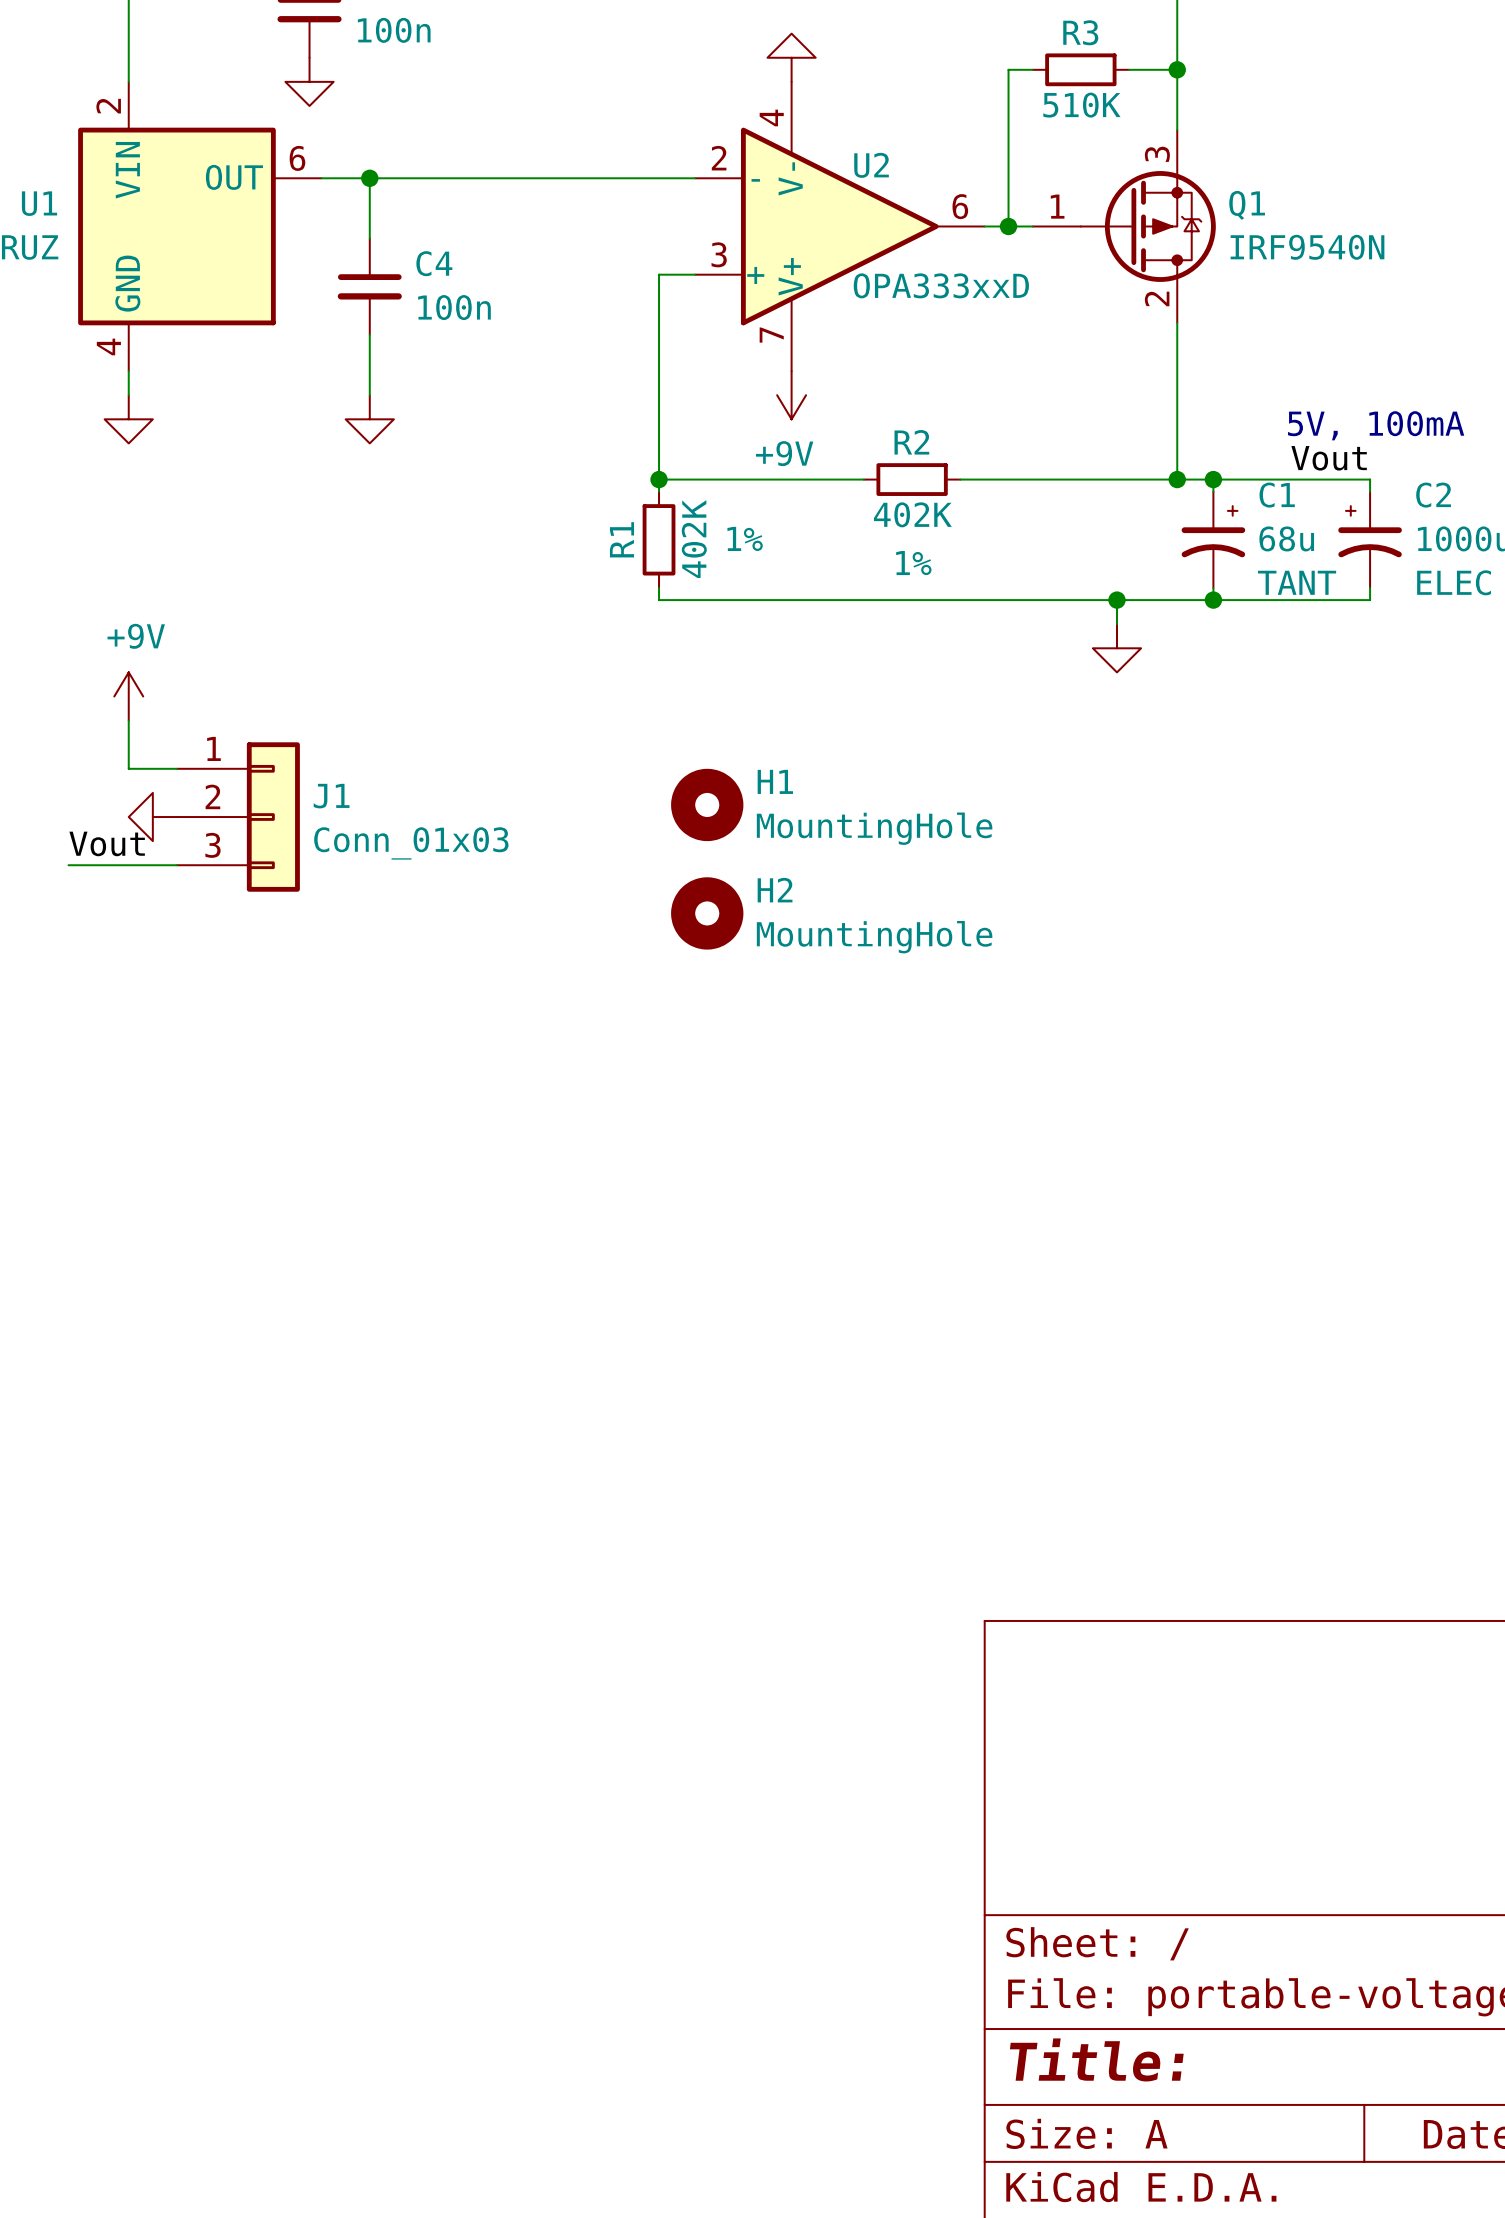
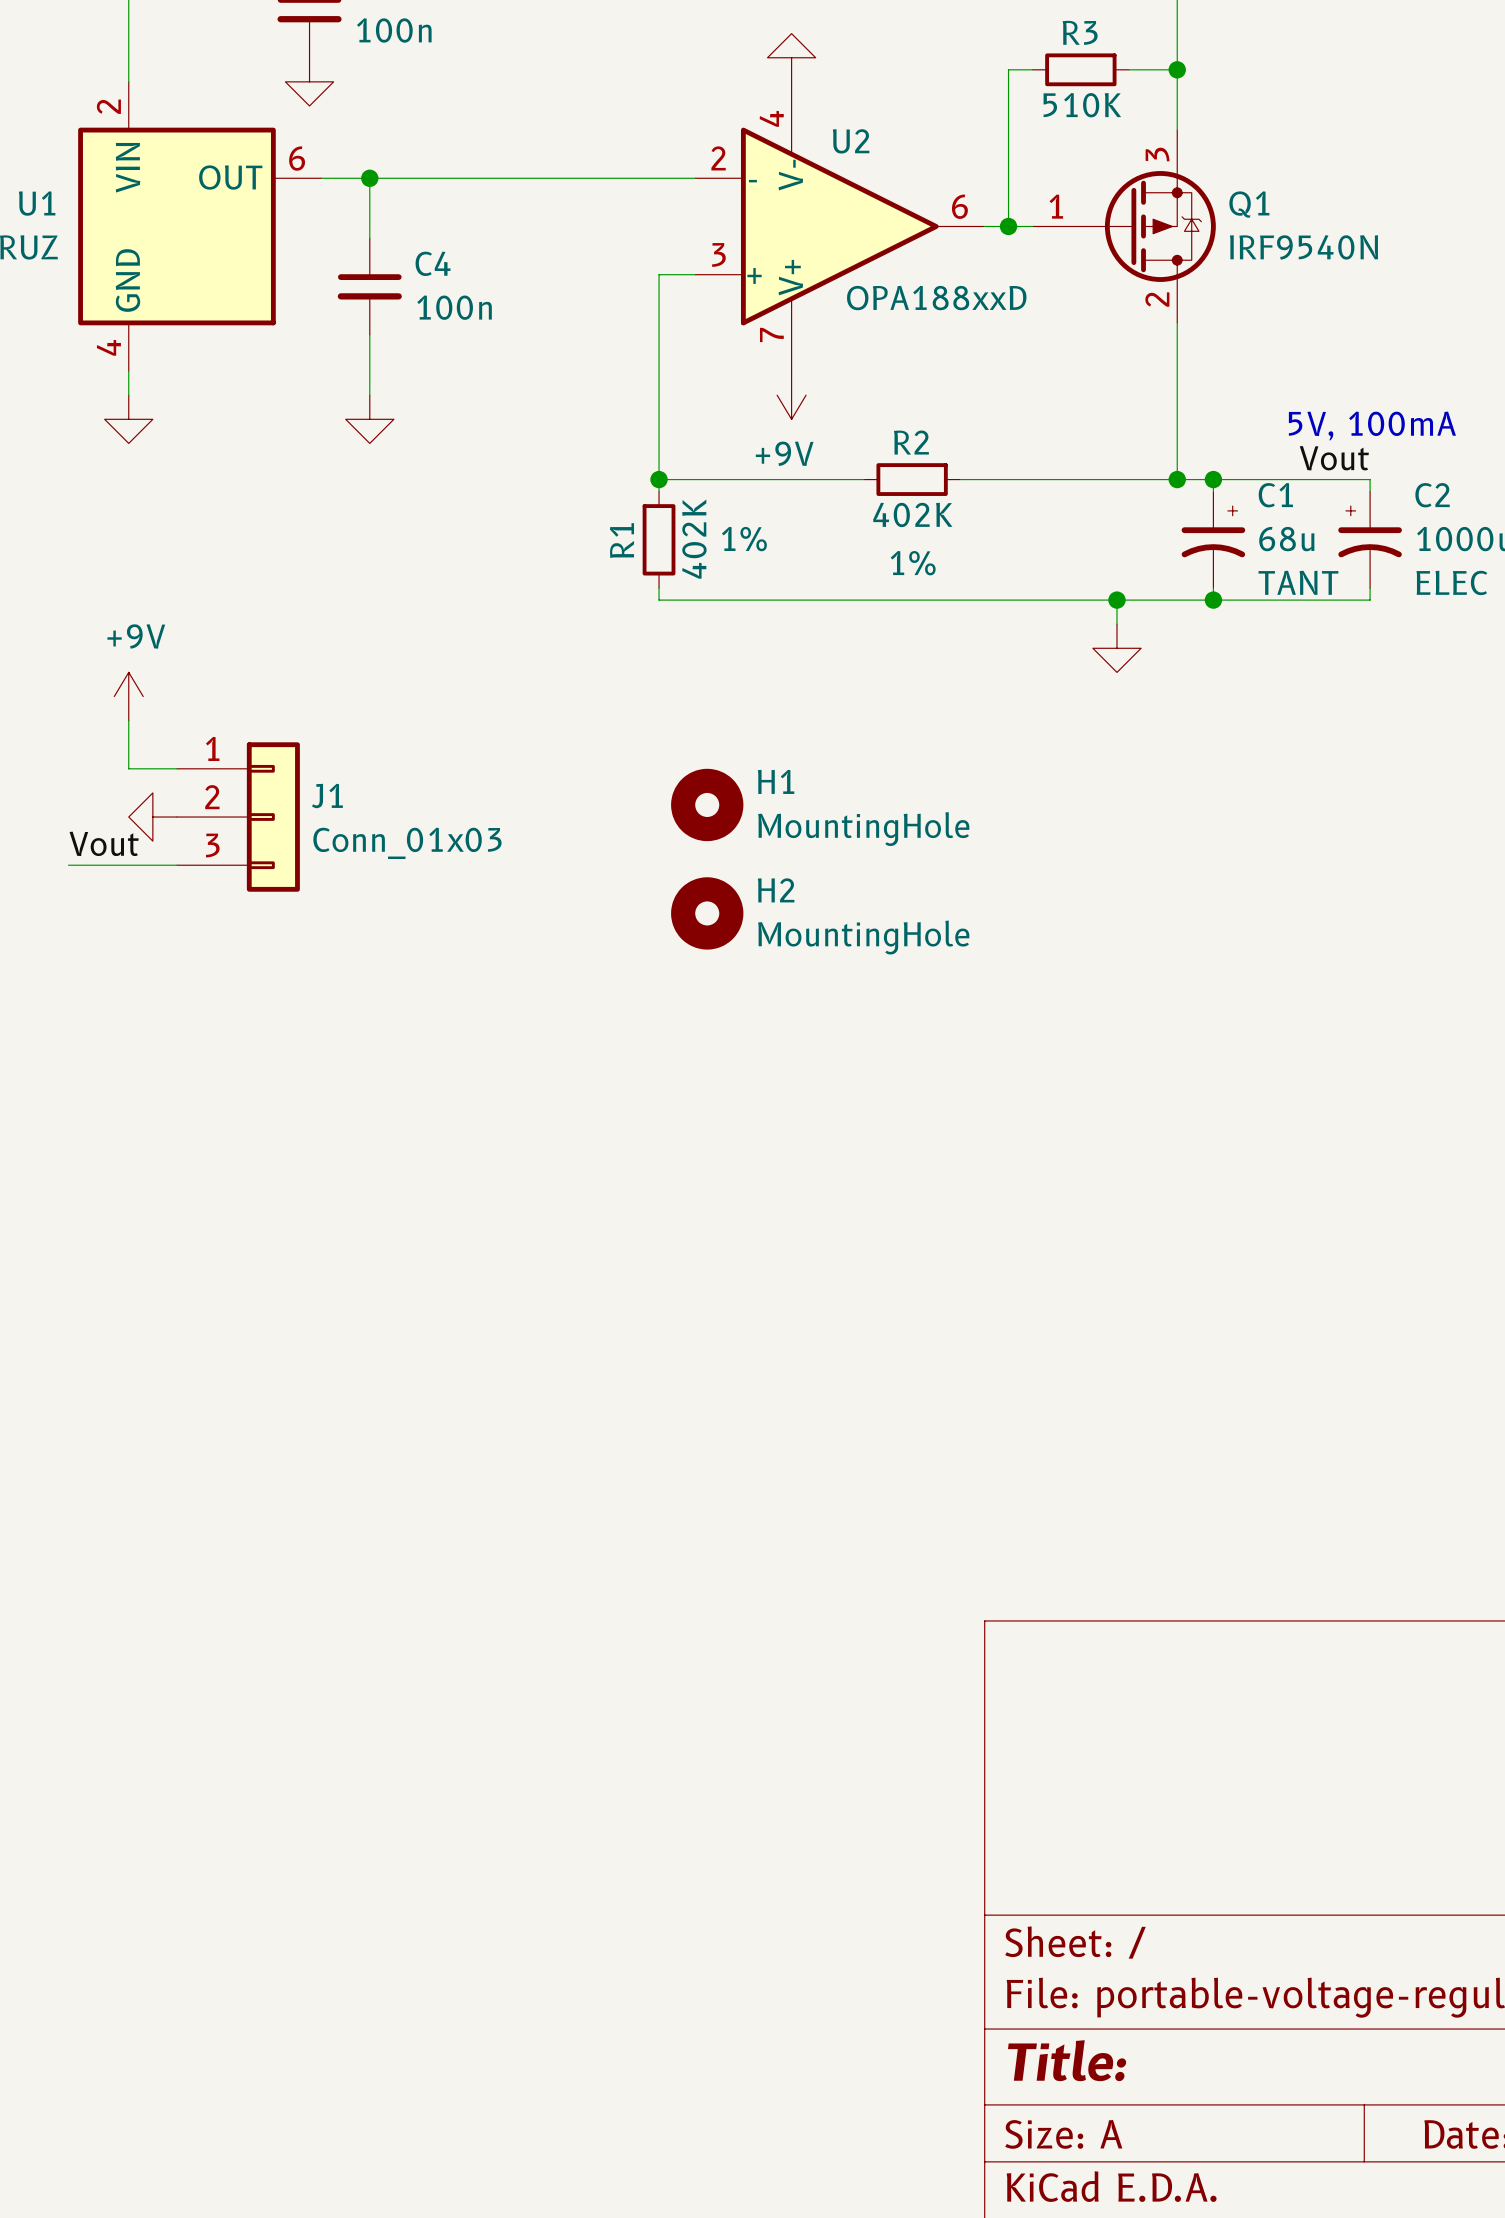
U2 name position: U2 (871, 165) -> U2 (851, 141)
U2 value: OPA333xxD (941, 285) -> OPA188xxD (936, 298)

